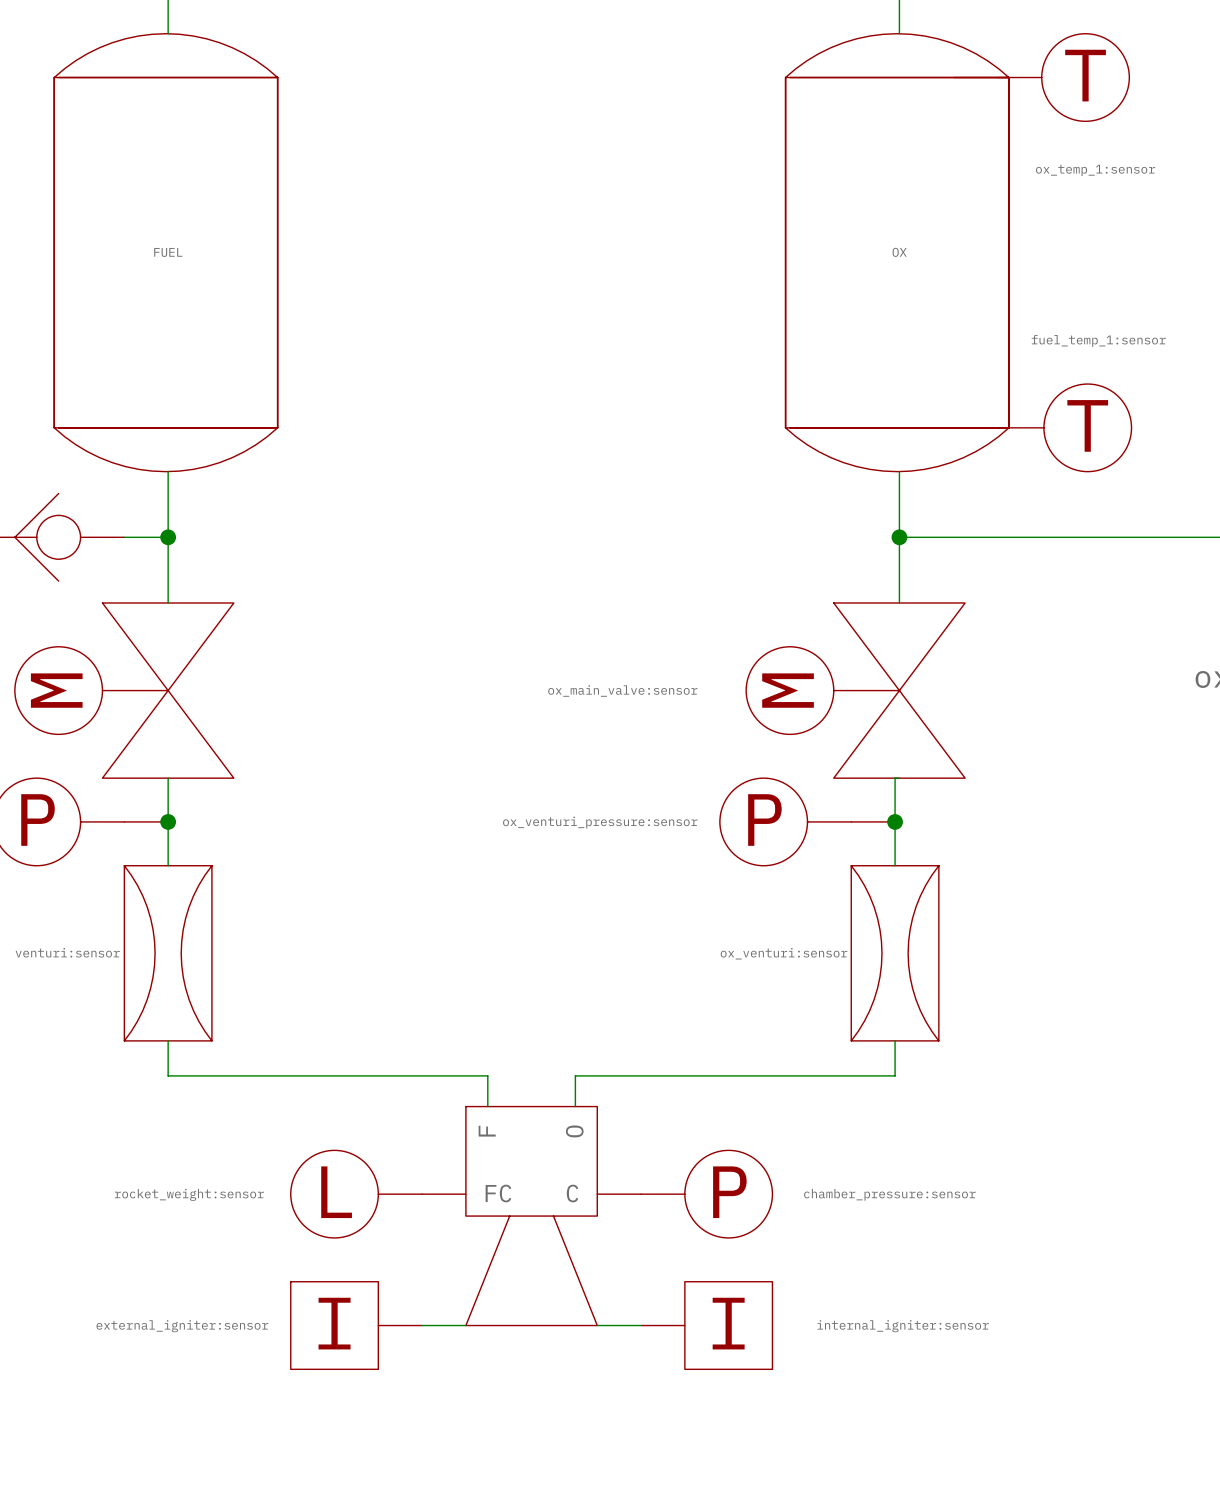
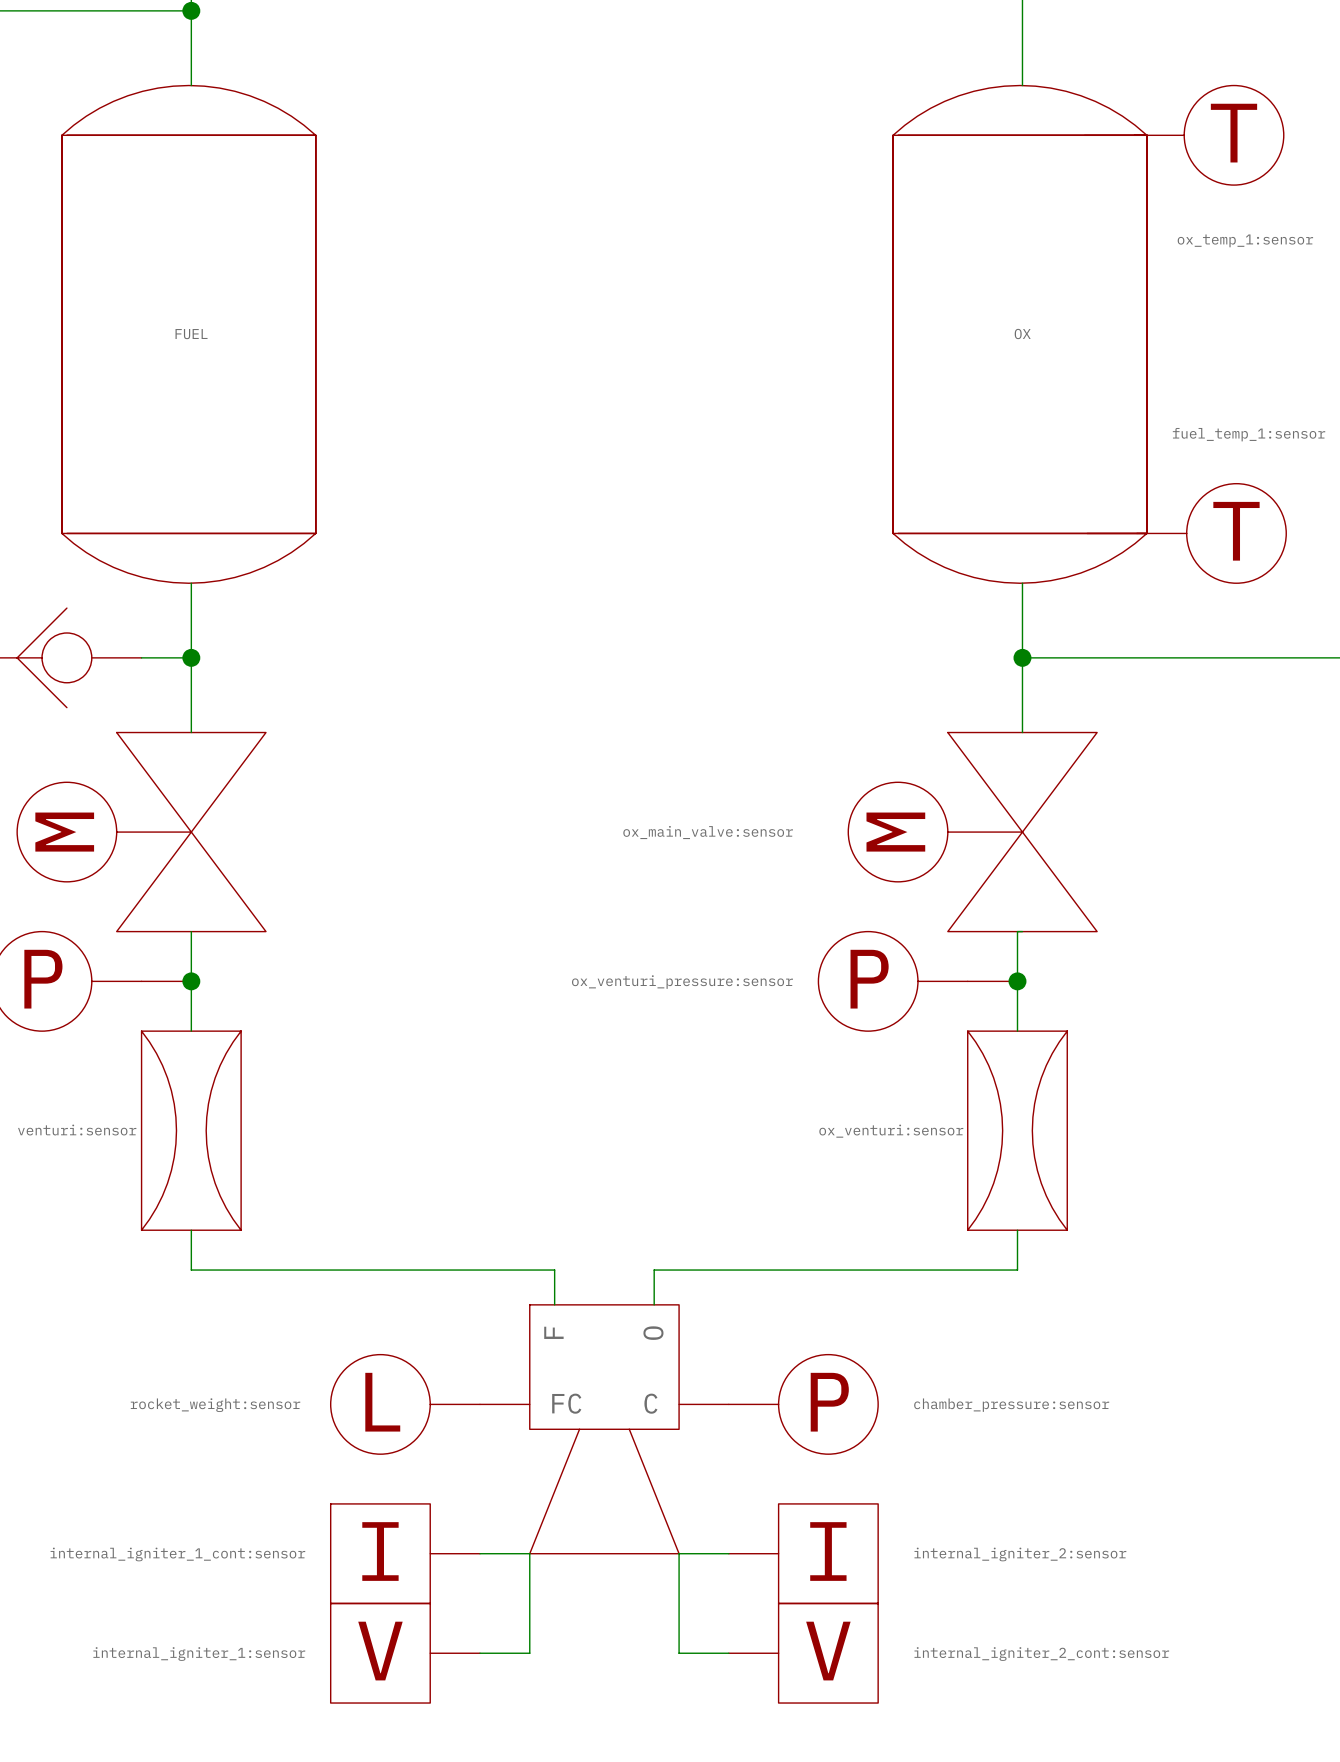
wire: none -> (529, 1553) (529, 1653) (479, 1653)
wire: none -> (679, 1553) (679, 1653) (728, 1653)
part value: external_igniter:sensor (182, 1326) -> internal_igniter_1_cont:sensor (177, 1554)
part value: internal_igniter:sensor (903, 1326) -> internal_igniter_2:sensor (1020, 1554)
part: none -> internal_igniter_1:sensor (405, 1653)
part: none -> internal_igniter_2_cont:sensor (803, 1653)

